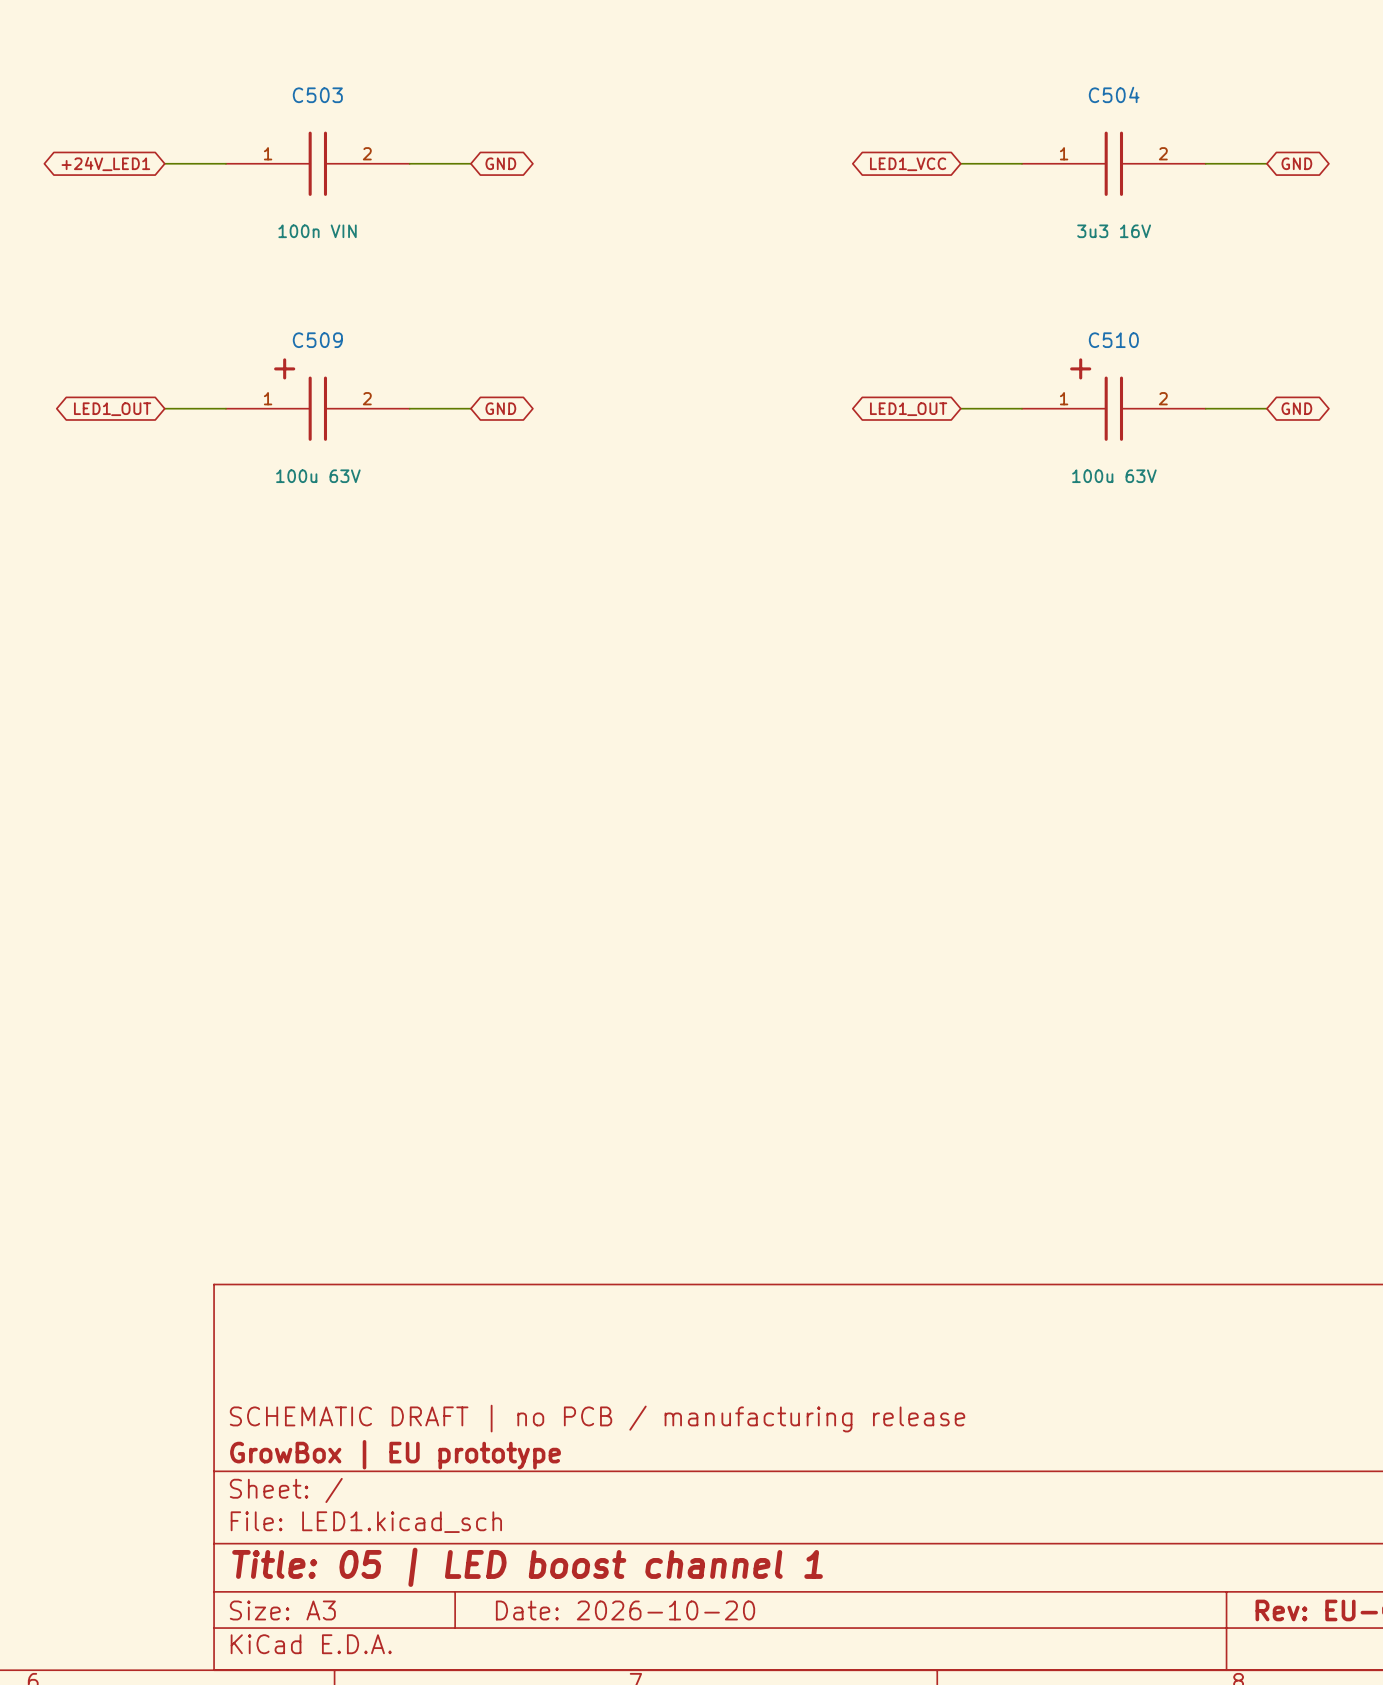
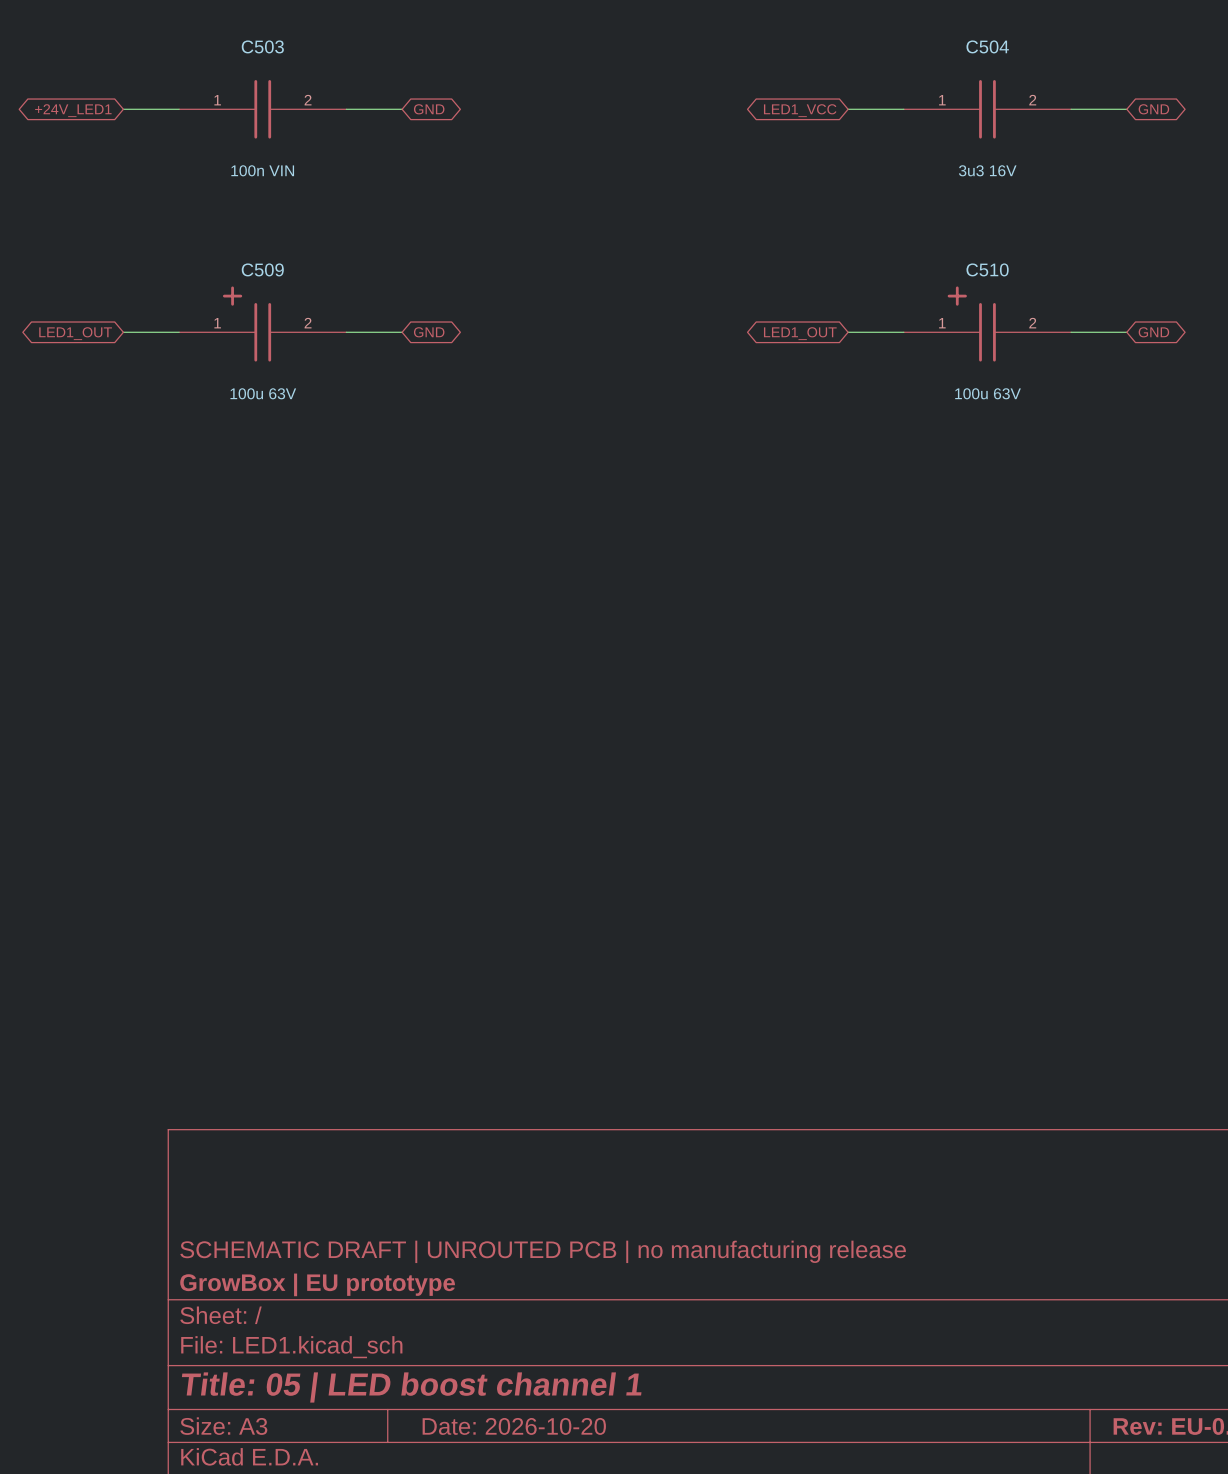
title block: SCHEMATIC DRAFT | no PCB / manufacturing release (597, 1418) -> SCHEMATIC DRAFT | UNROUTED PCB | no manufacturing release (543, 1251)

